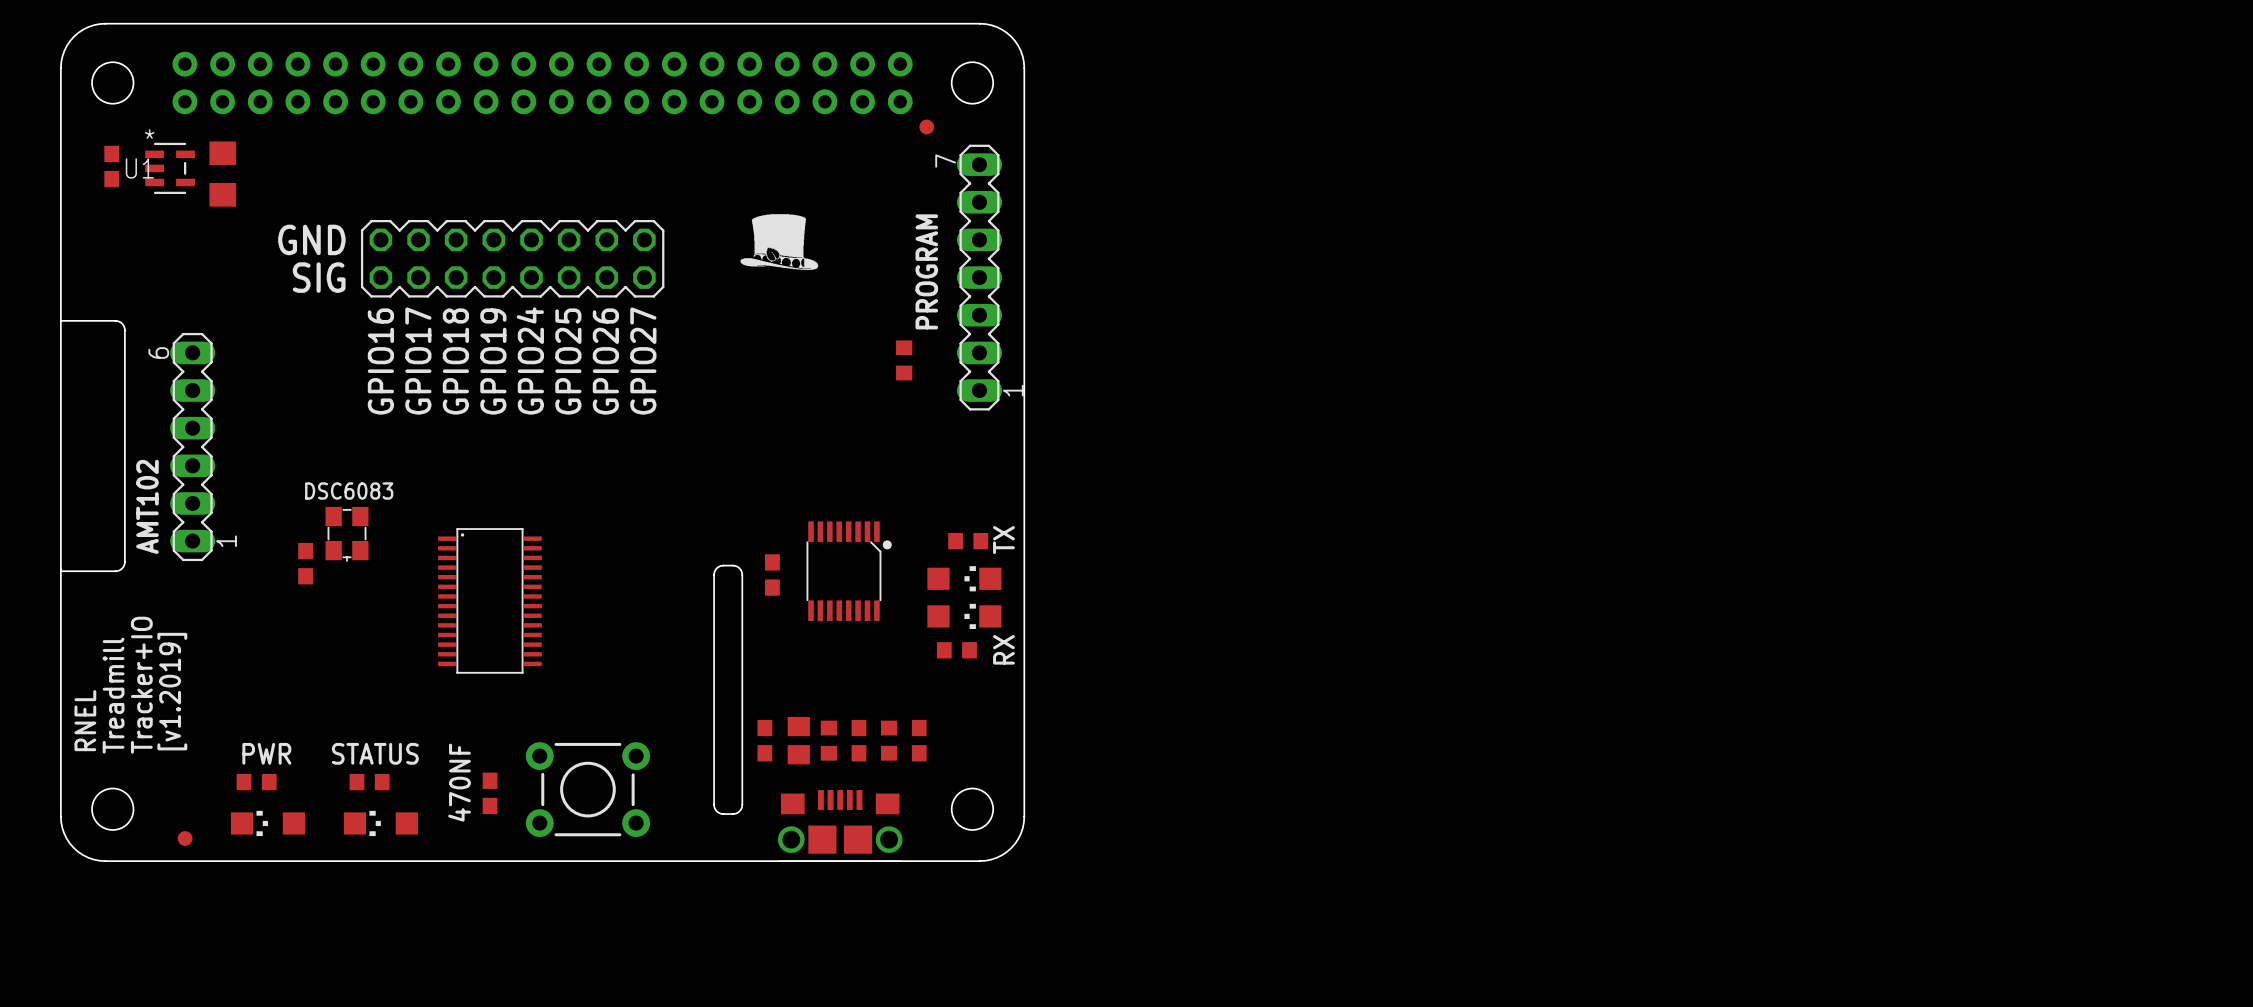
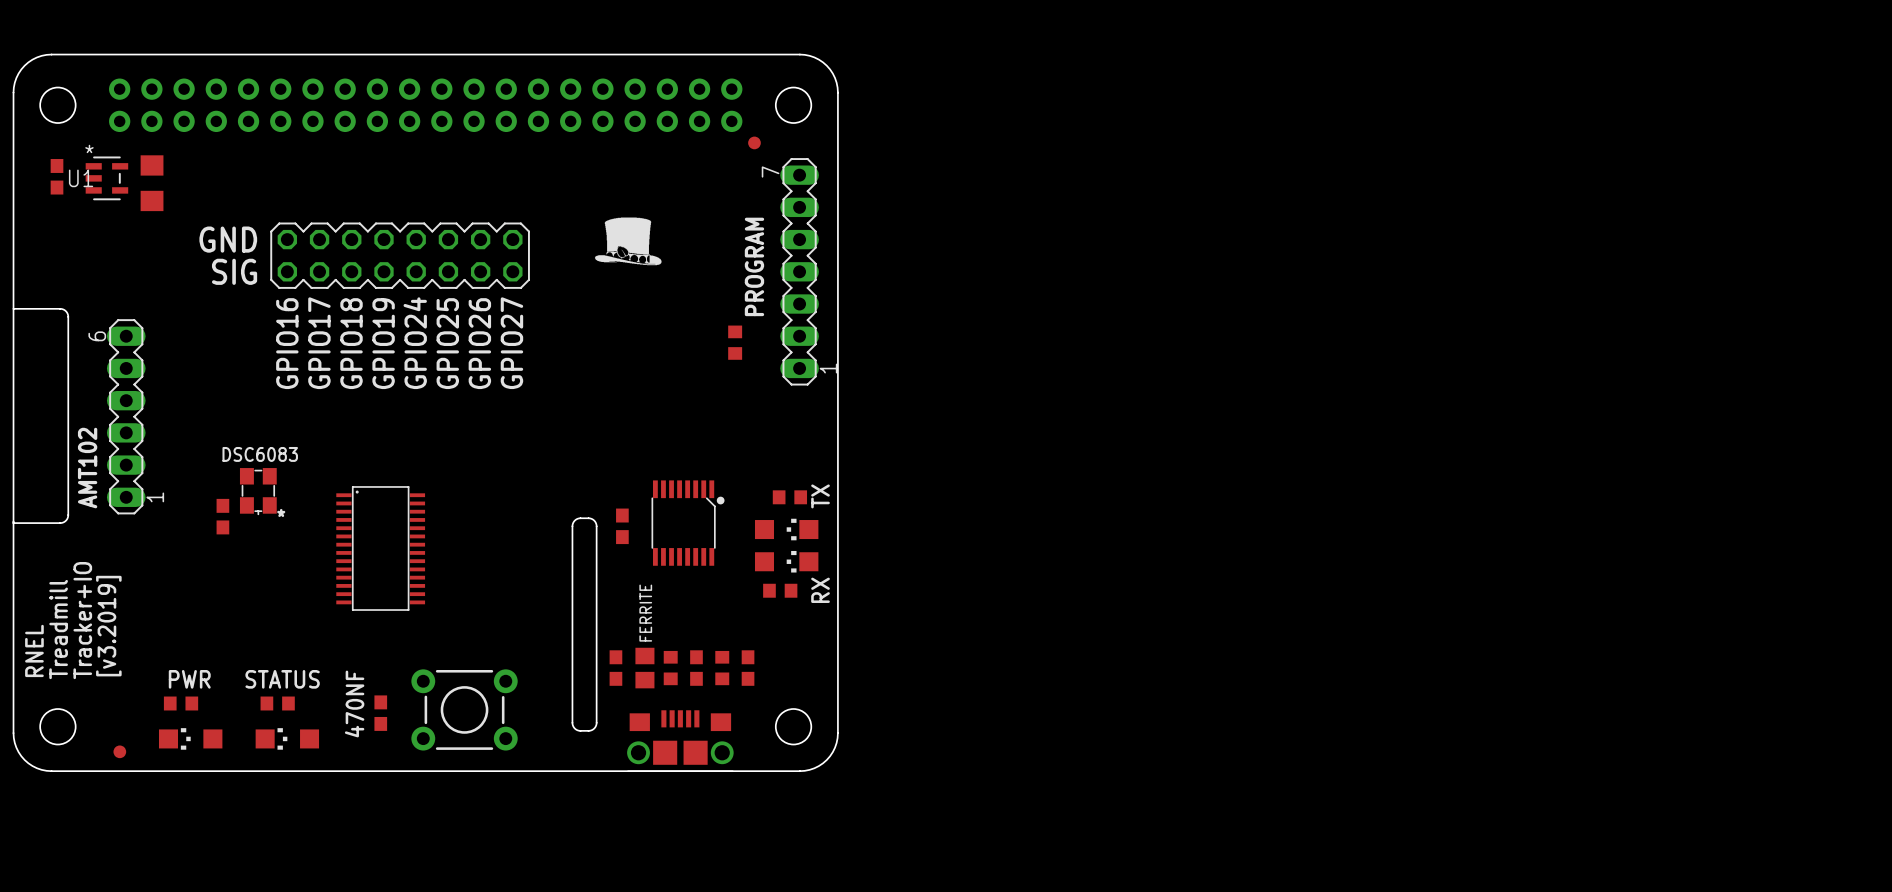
text: none -> * (281, 512)
FERRITE name: none -> FERRITE (645, 613)
text: [v1.2019] (172, 691) -> [v3.2019] (108, 626)

